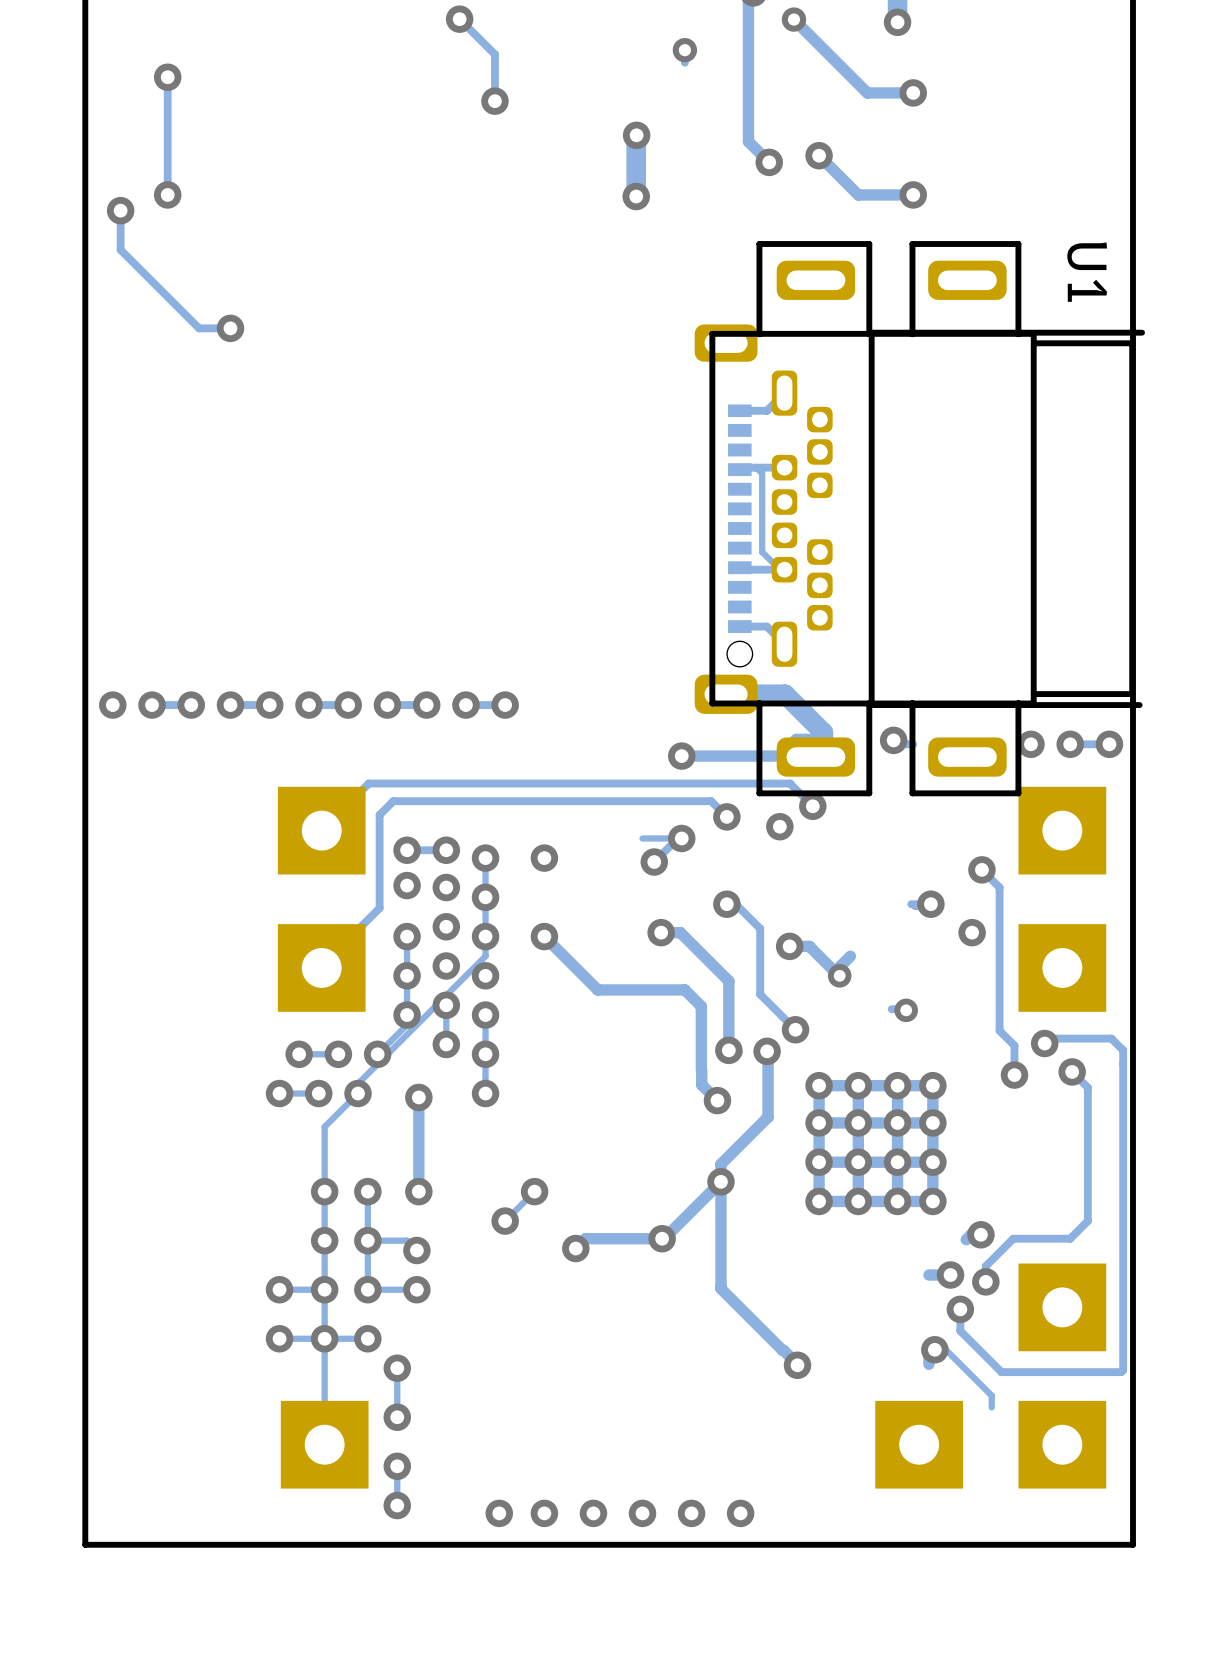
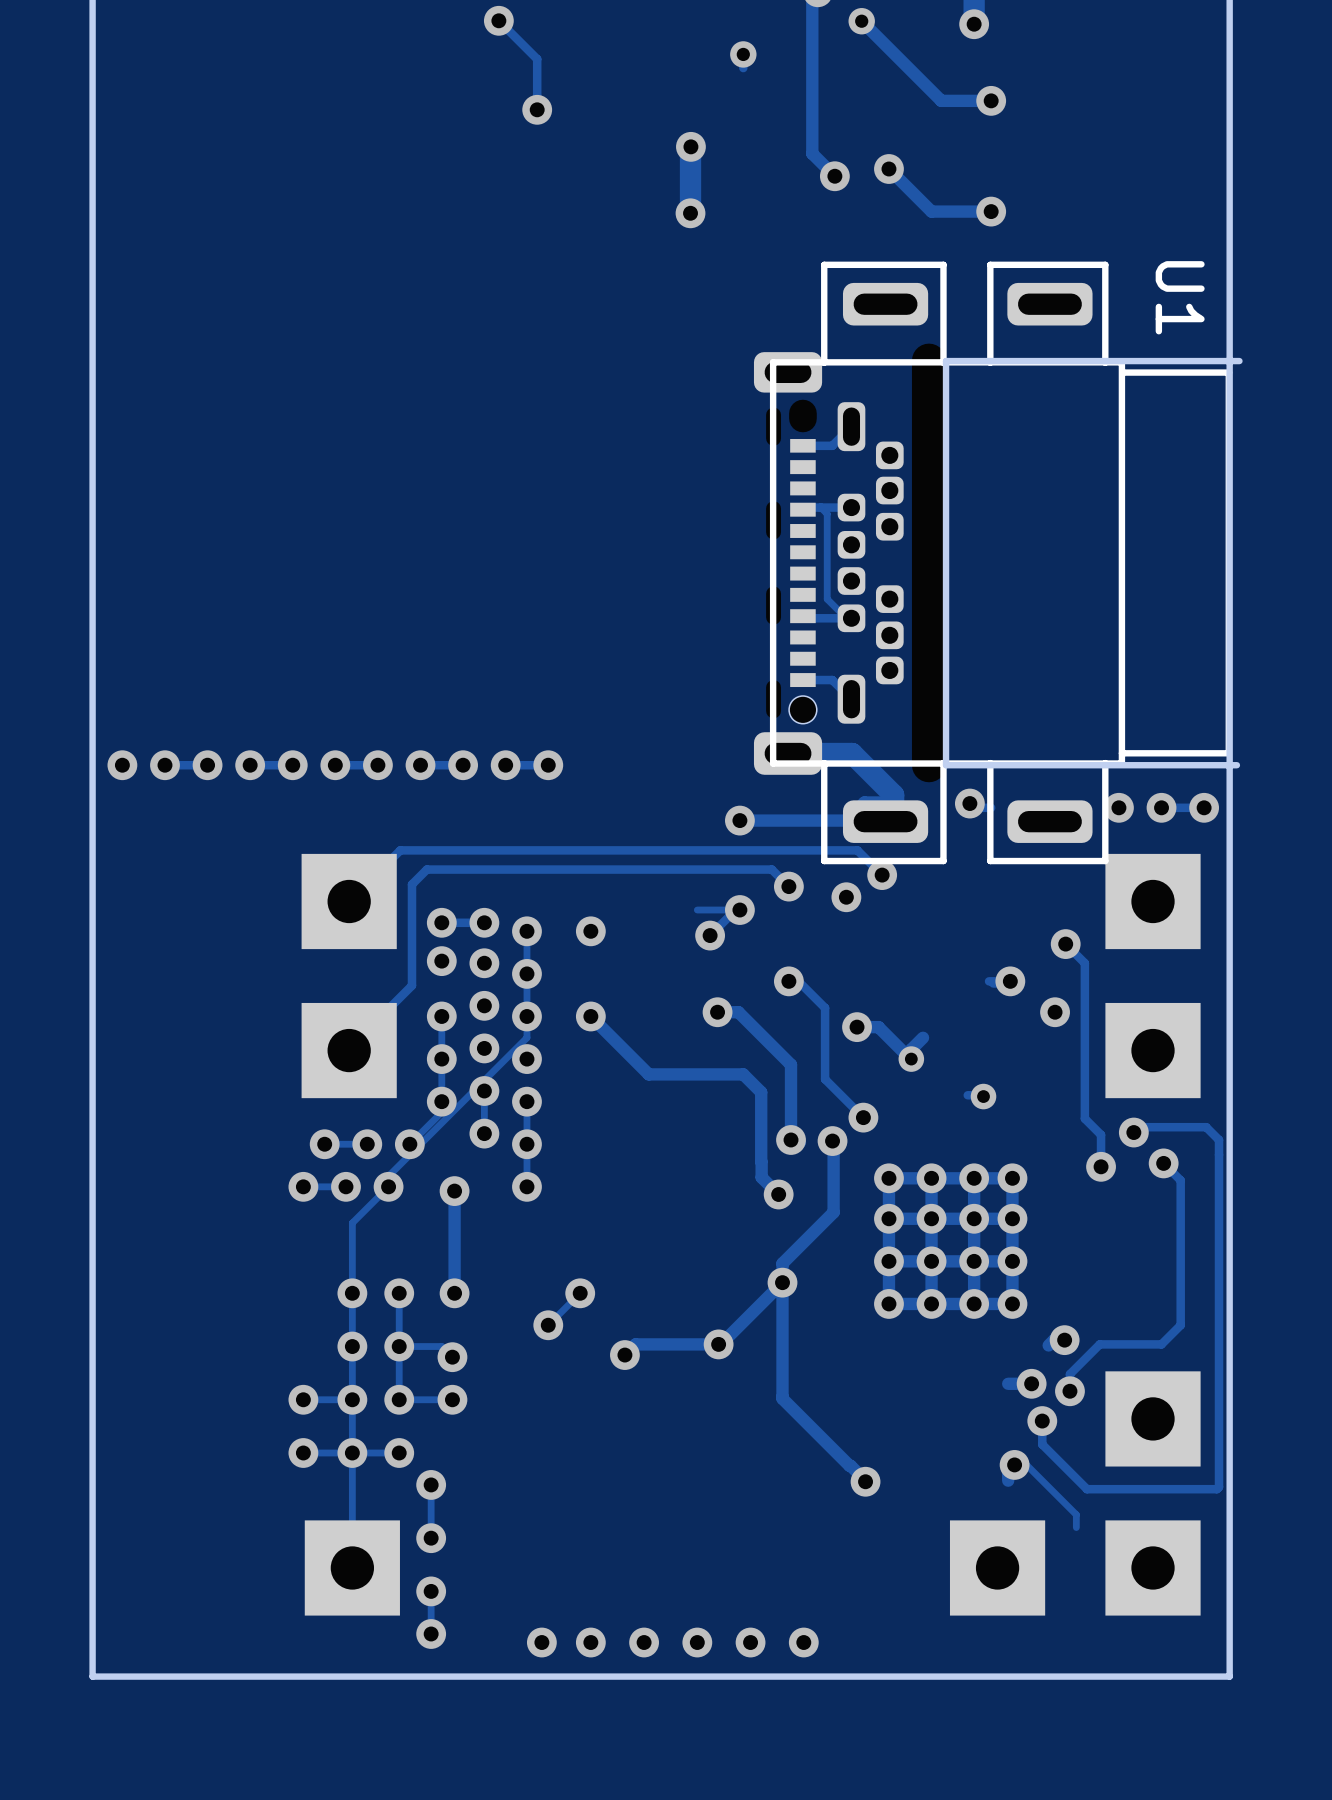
track: (167, 77) (167, 194) -> none
via: (167, 77) -> none
via: (167, 194) -> none
track: (120, 210) (120, 249) (199, 328) (230, 328) -> none
via: (120, 210) -> none
via: (230, 328) -> none

